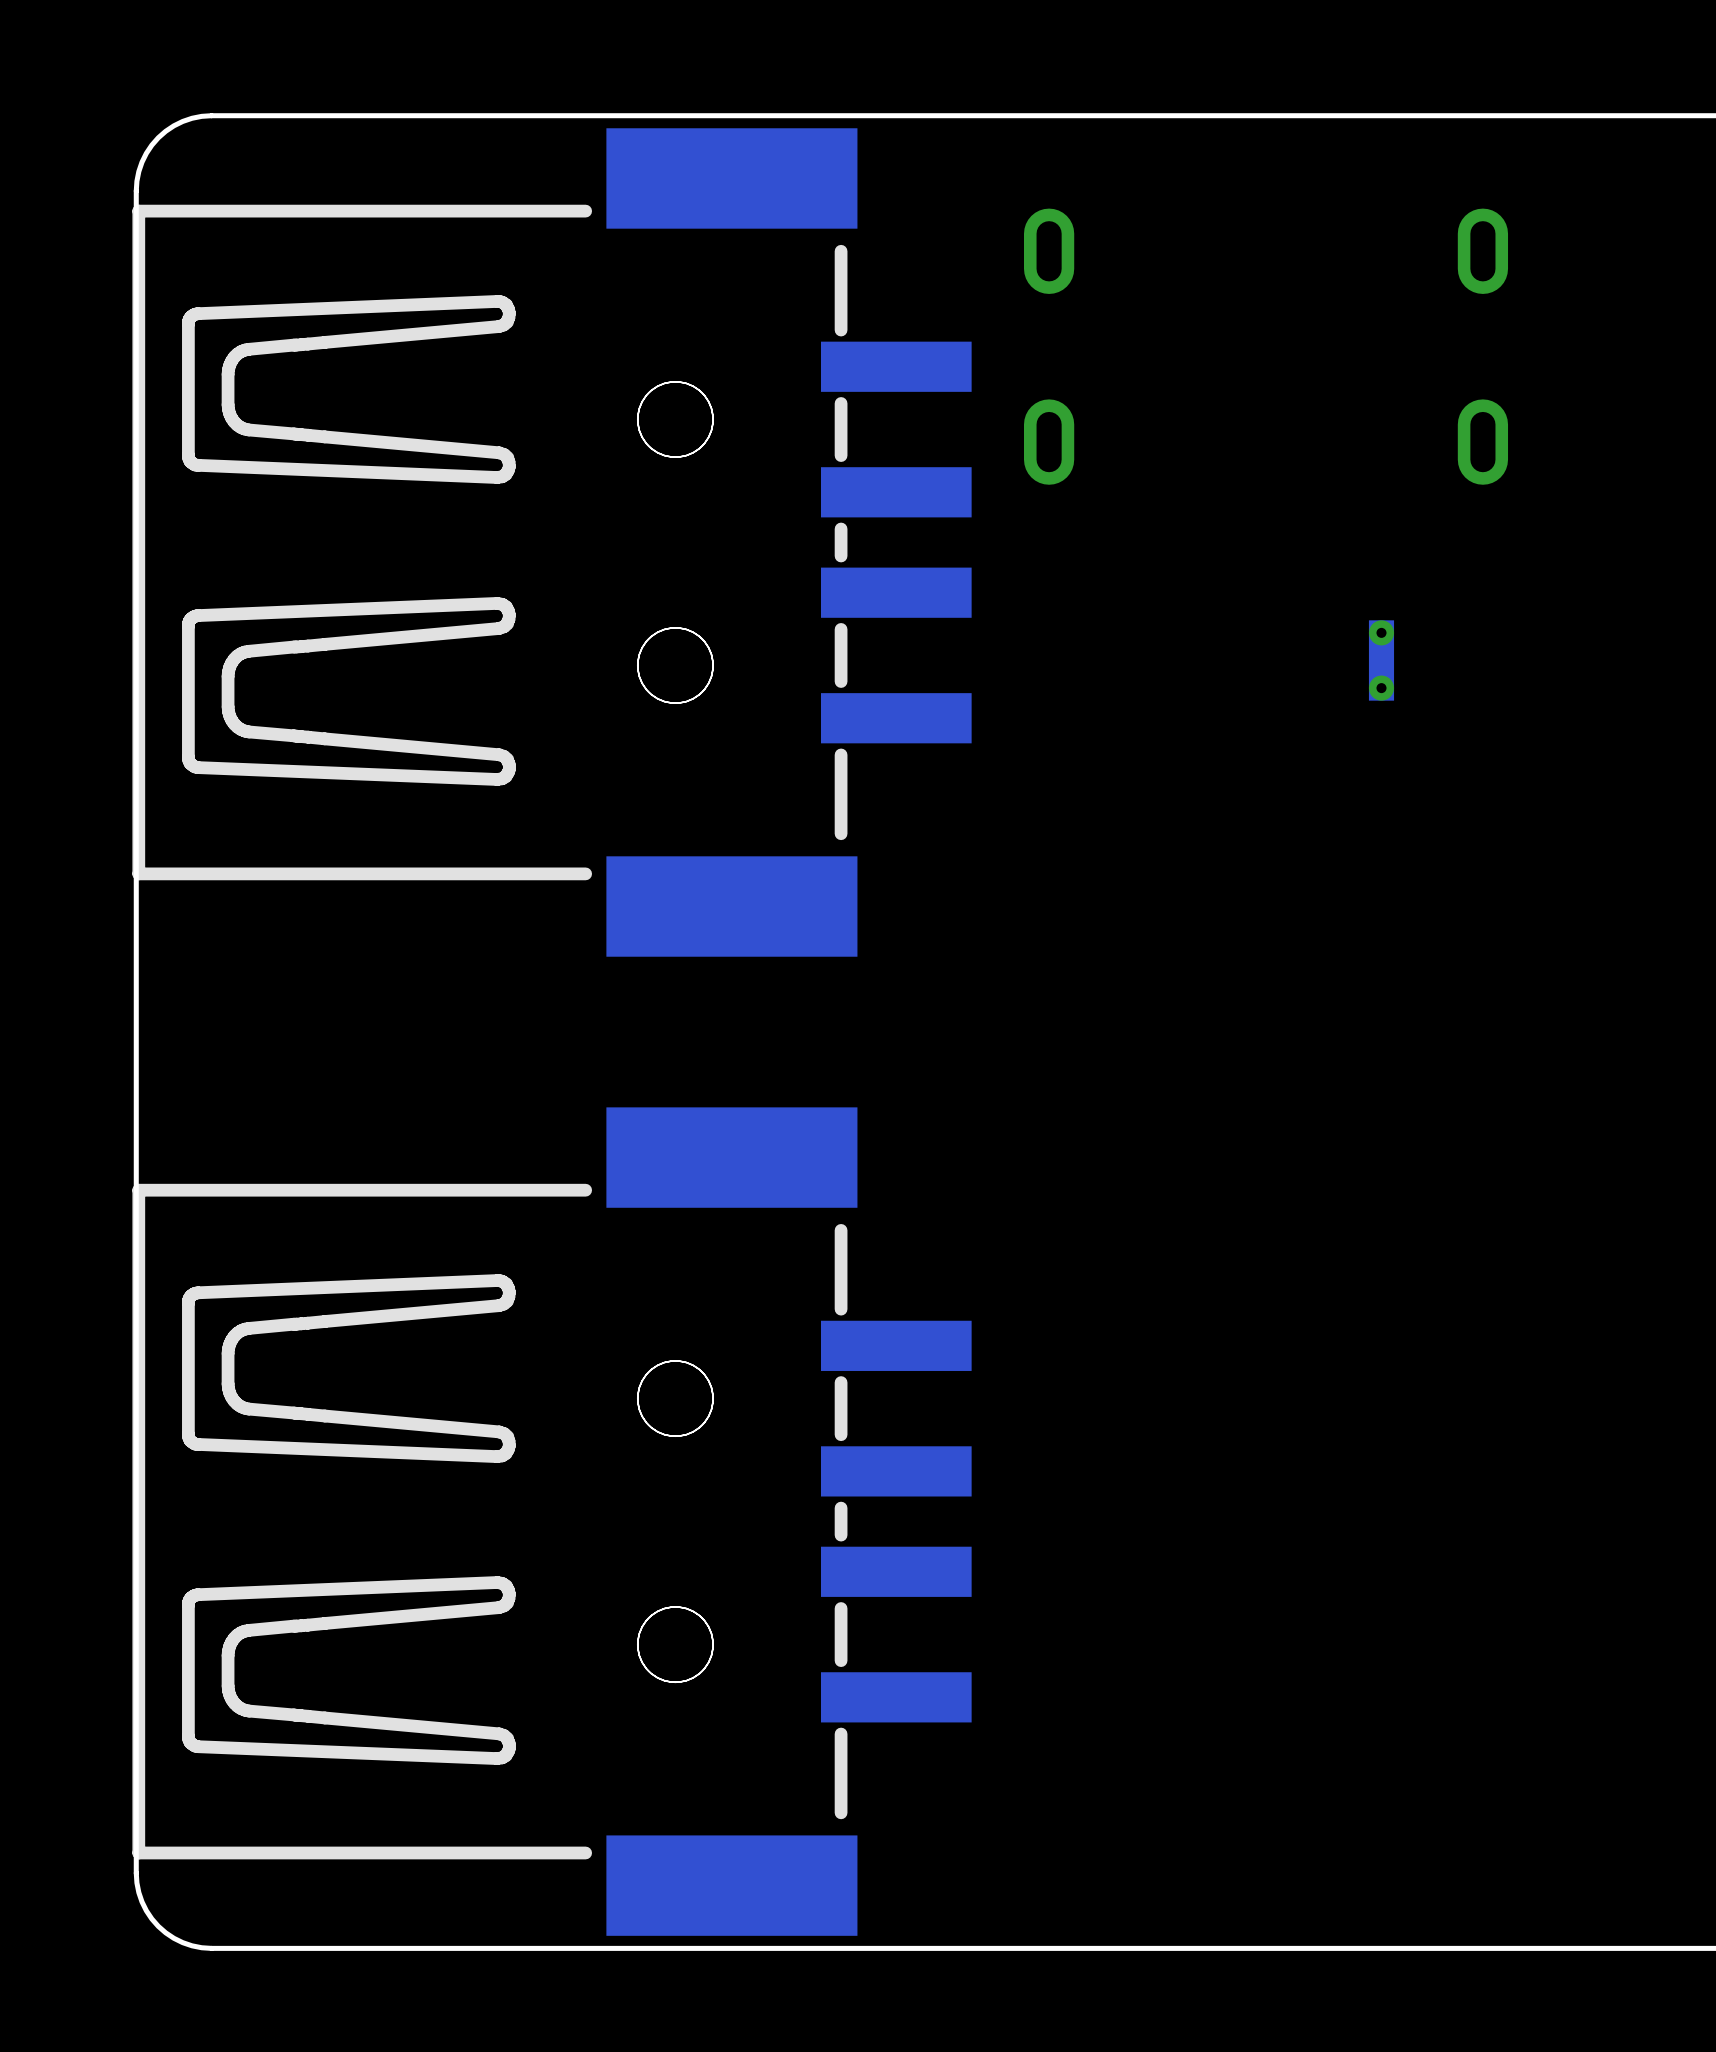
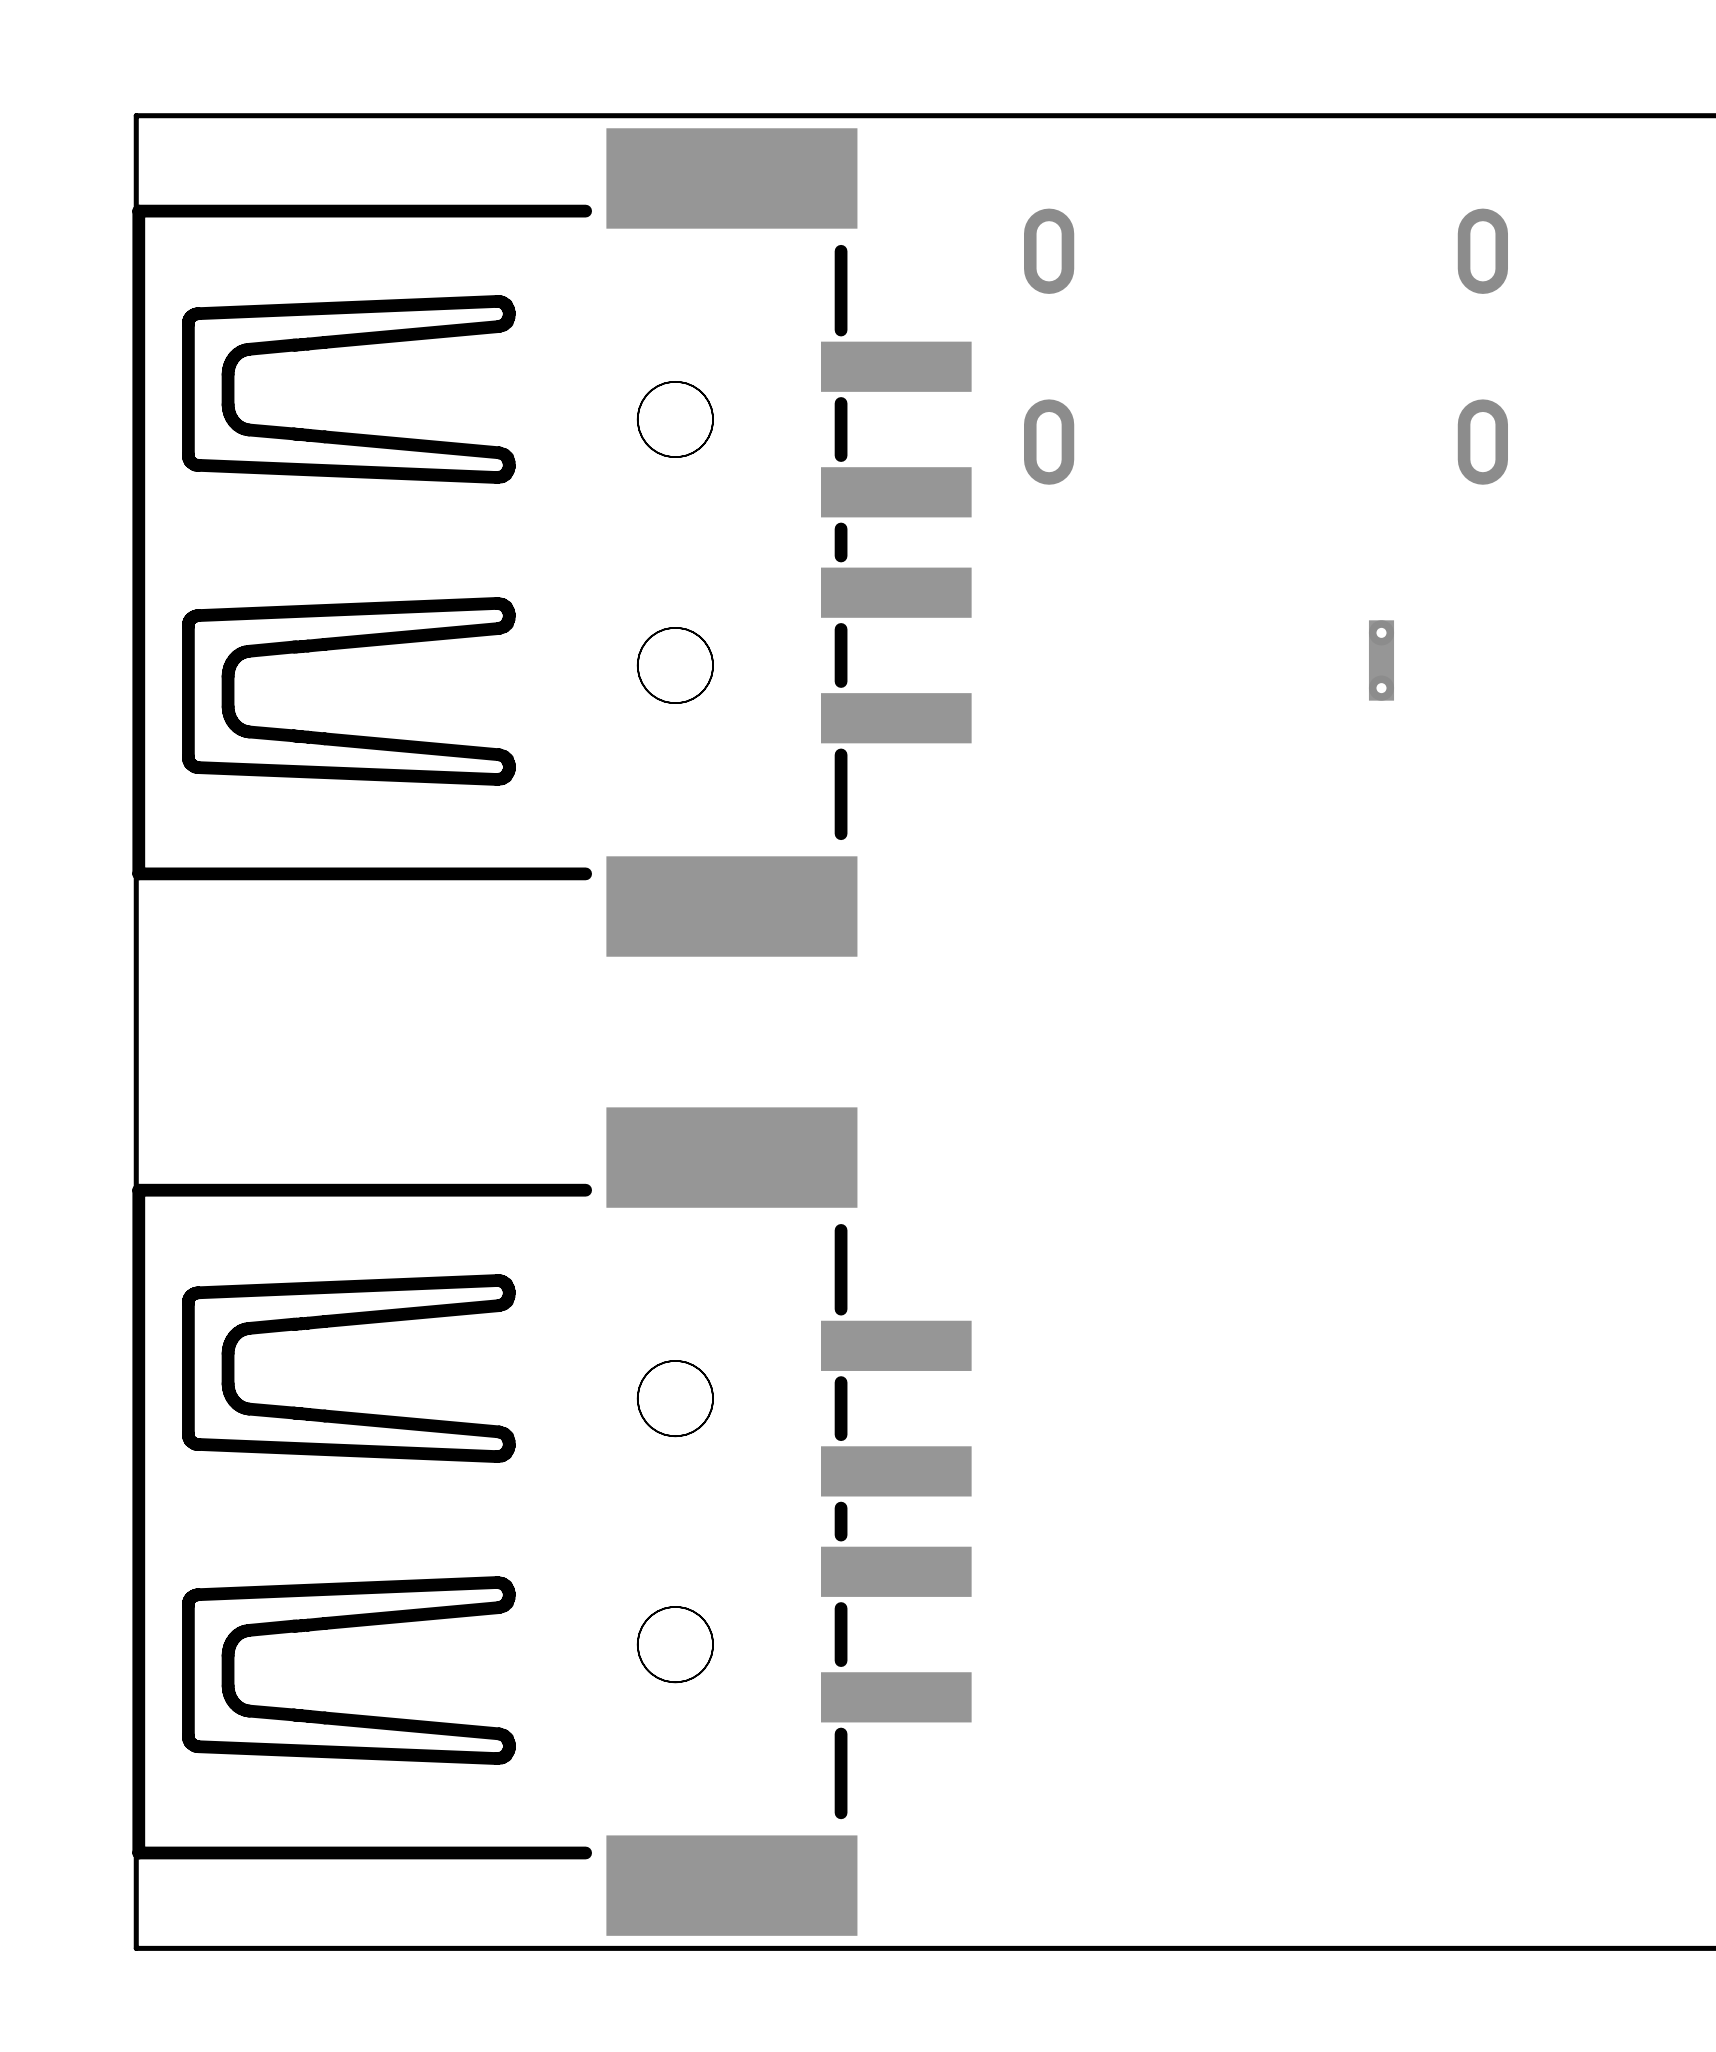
board edge: (211, 115) (182, 121) (158, 137) (142, 162) (136, 191) -> (211, 115) (136, 115) (136, 191)
board edge: (136, 1873) (142, 1901) (158, 1926) (182, 1942) (211, 1948) -> (136, 1873) (136, 1948) (211, 1948)

